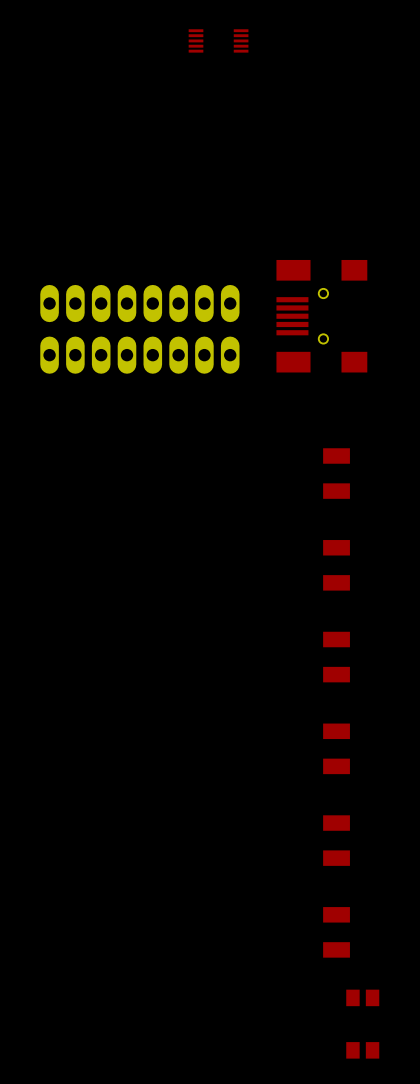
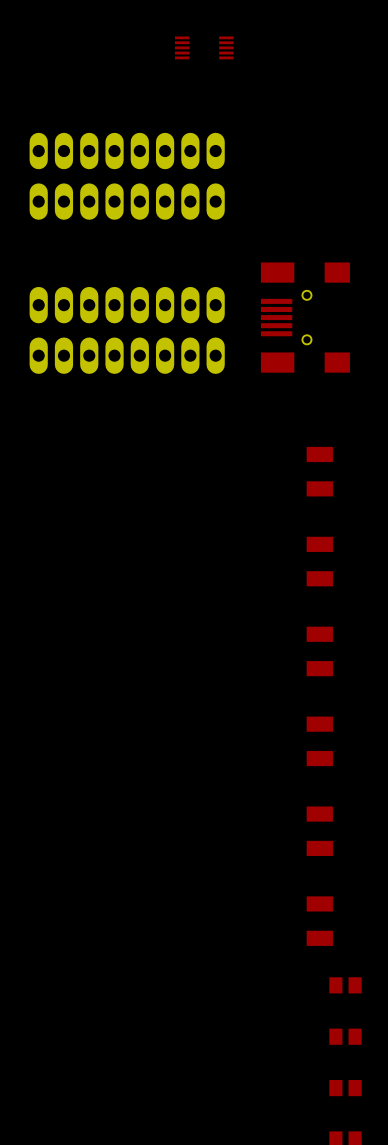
part: none -> (127, 176)

